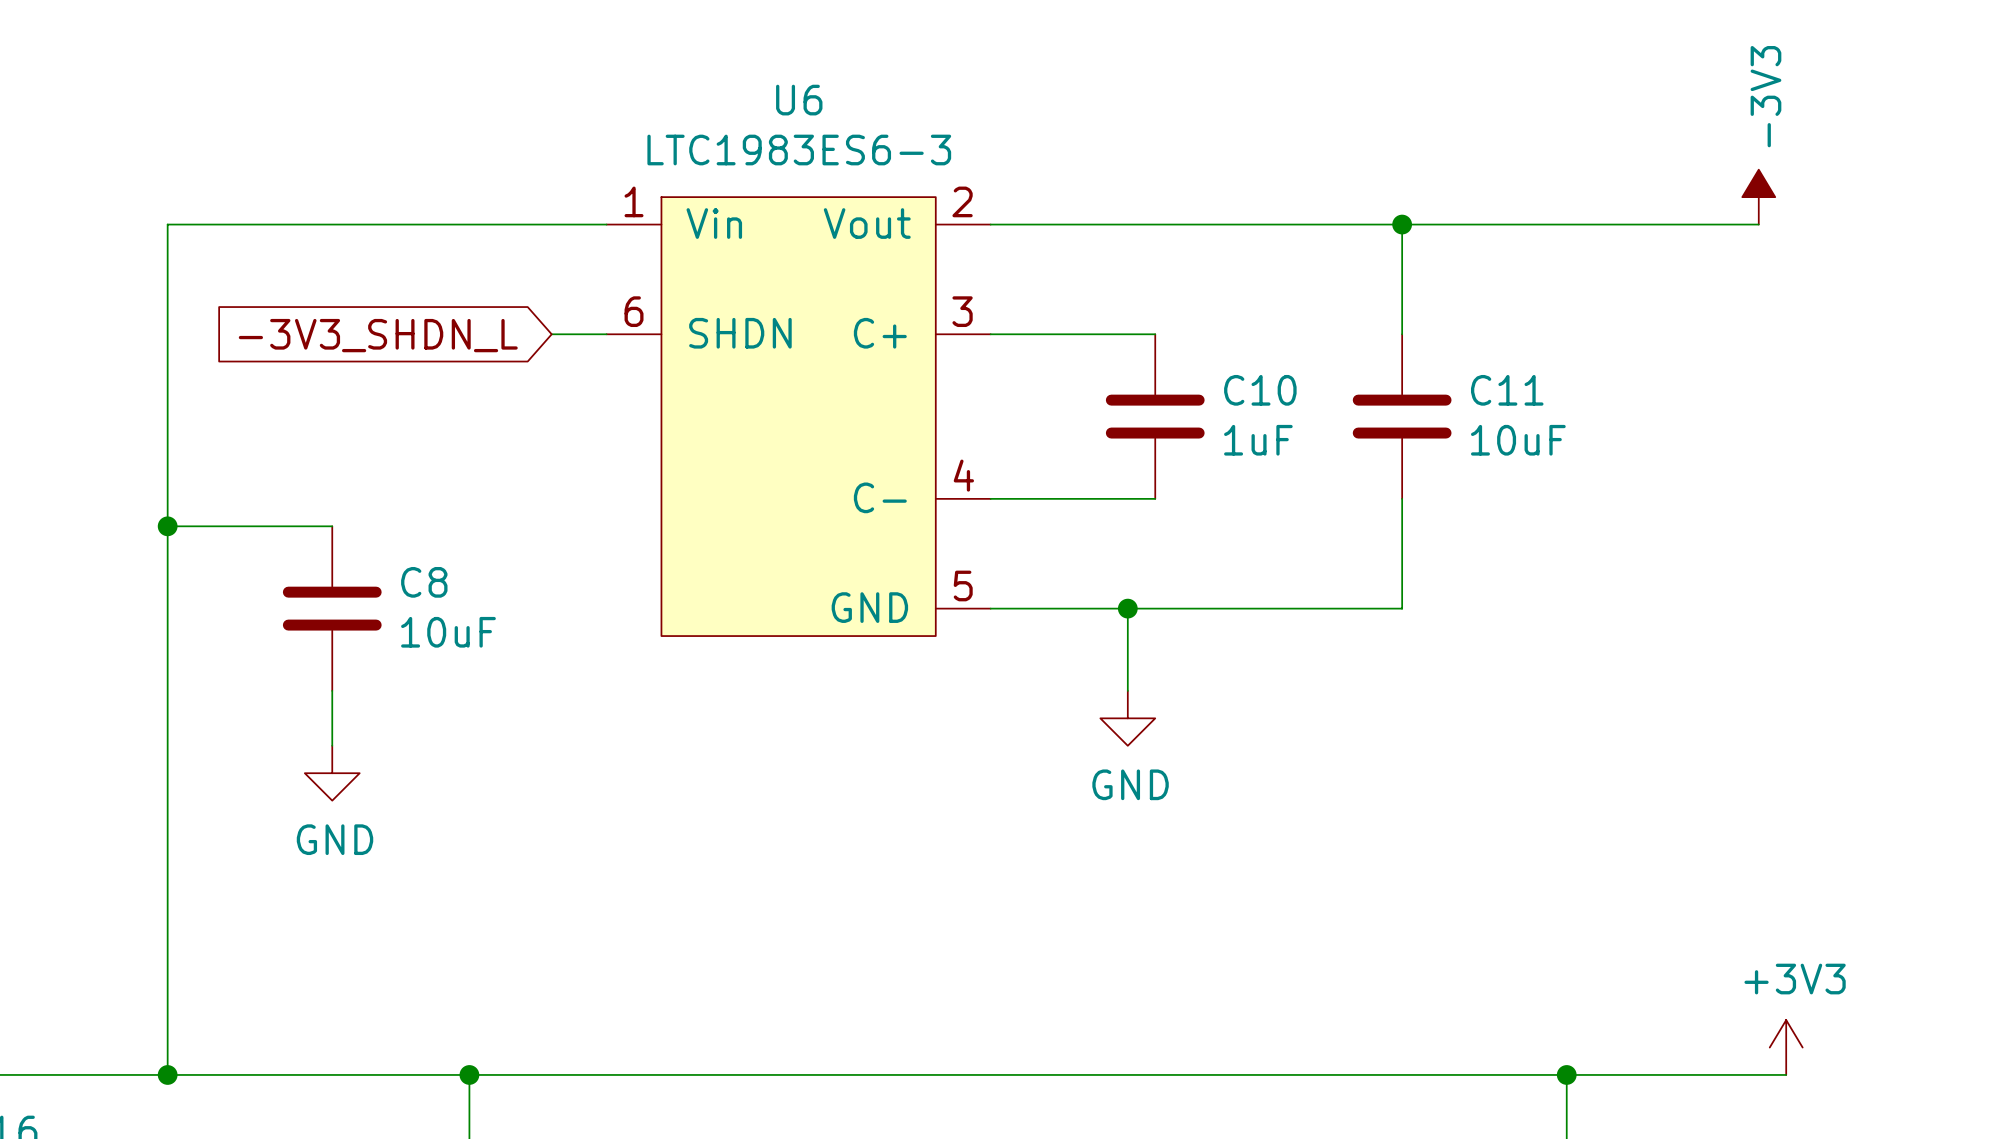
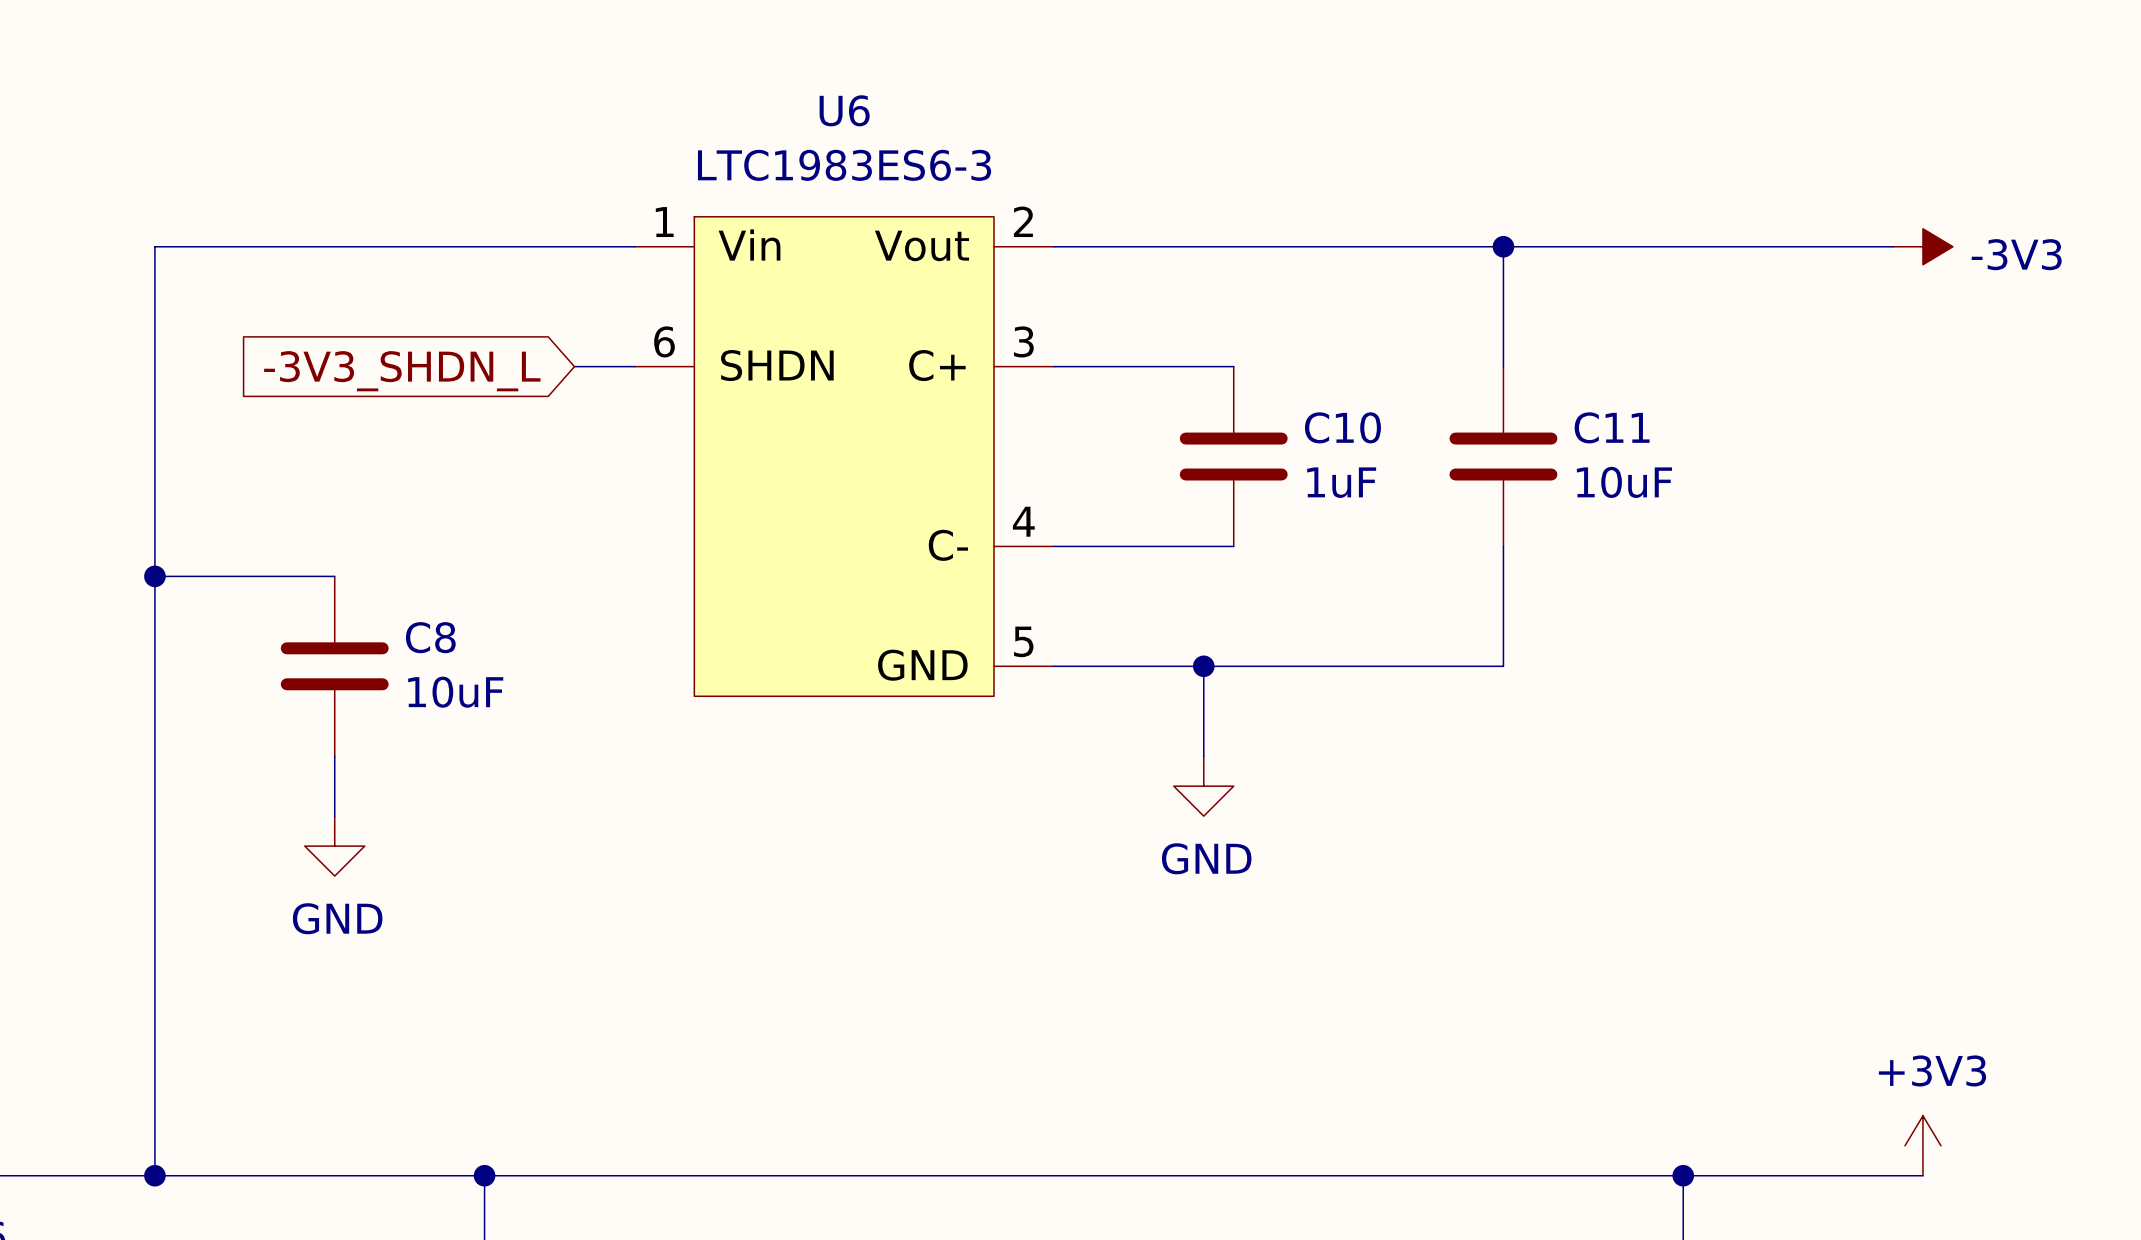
power symbol rotation: 0° (1758, 197) -> 90° clockwise (1922, 246)
power symbol position: -3V3 (1758, 197) -> -3V3 (1922, 246)

